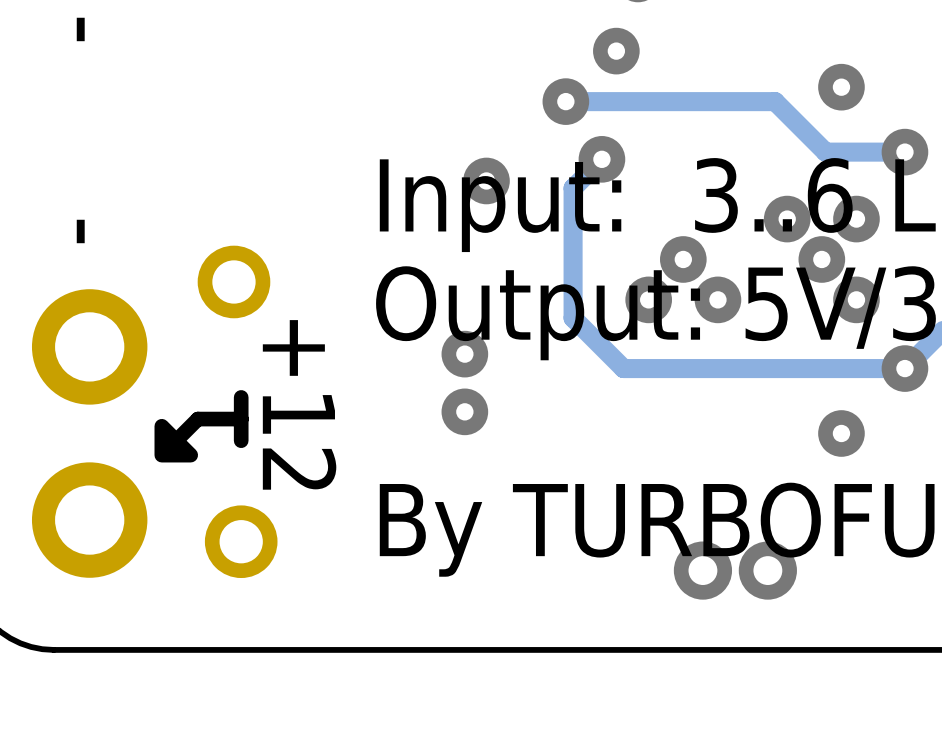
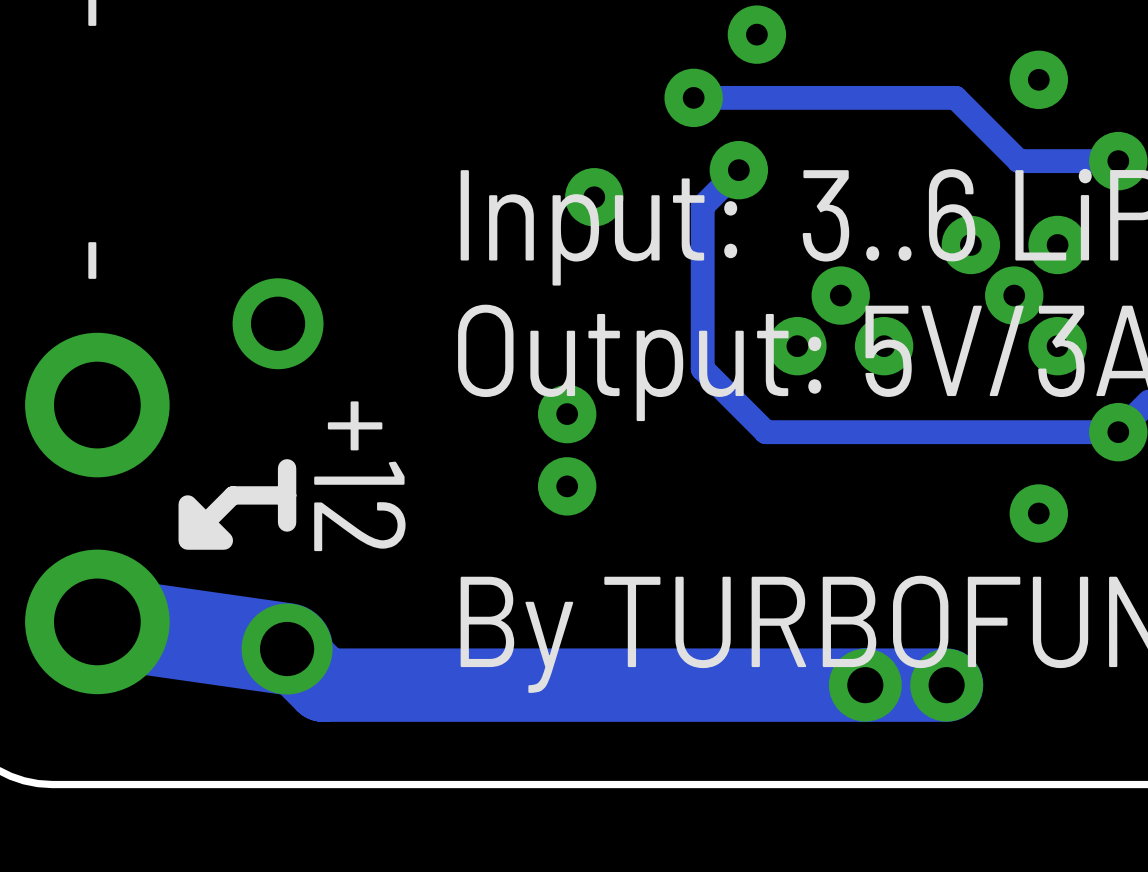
track: none -> (97, 621) (287, 649) (323, 685) (946, 685)

